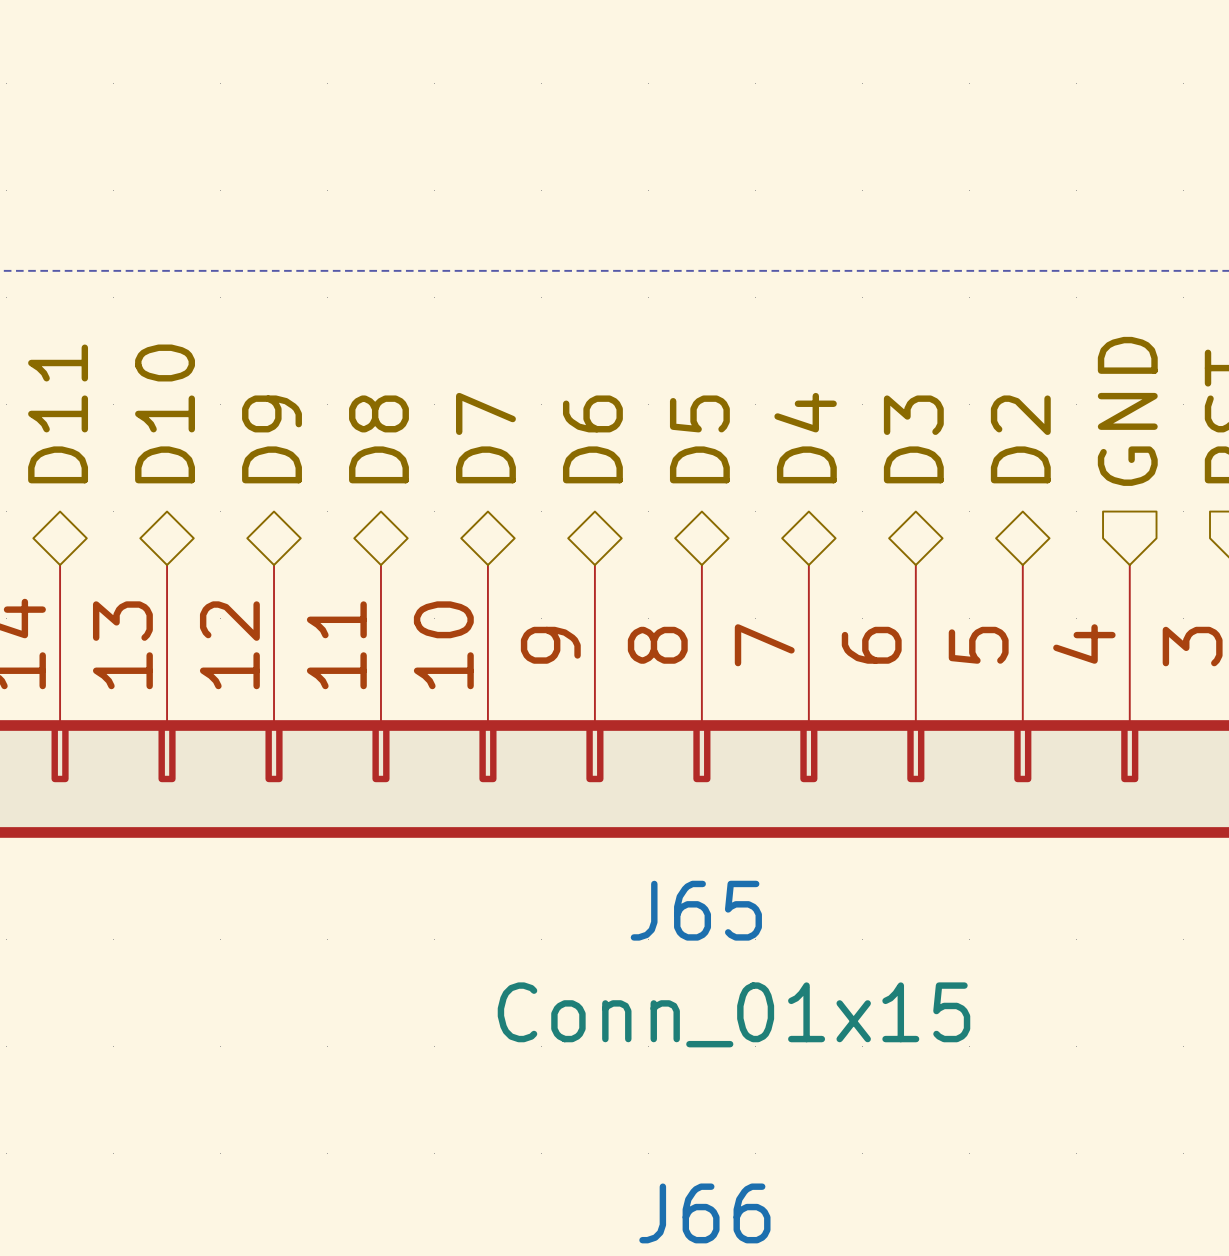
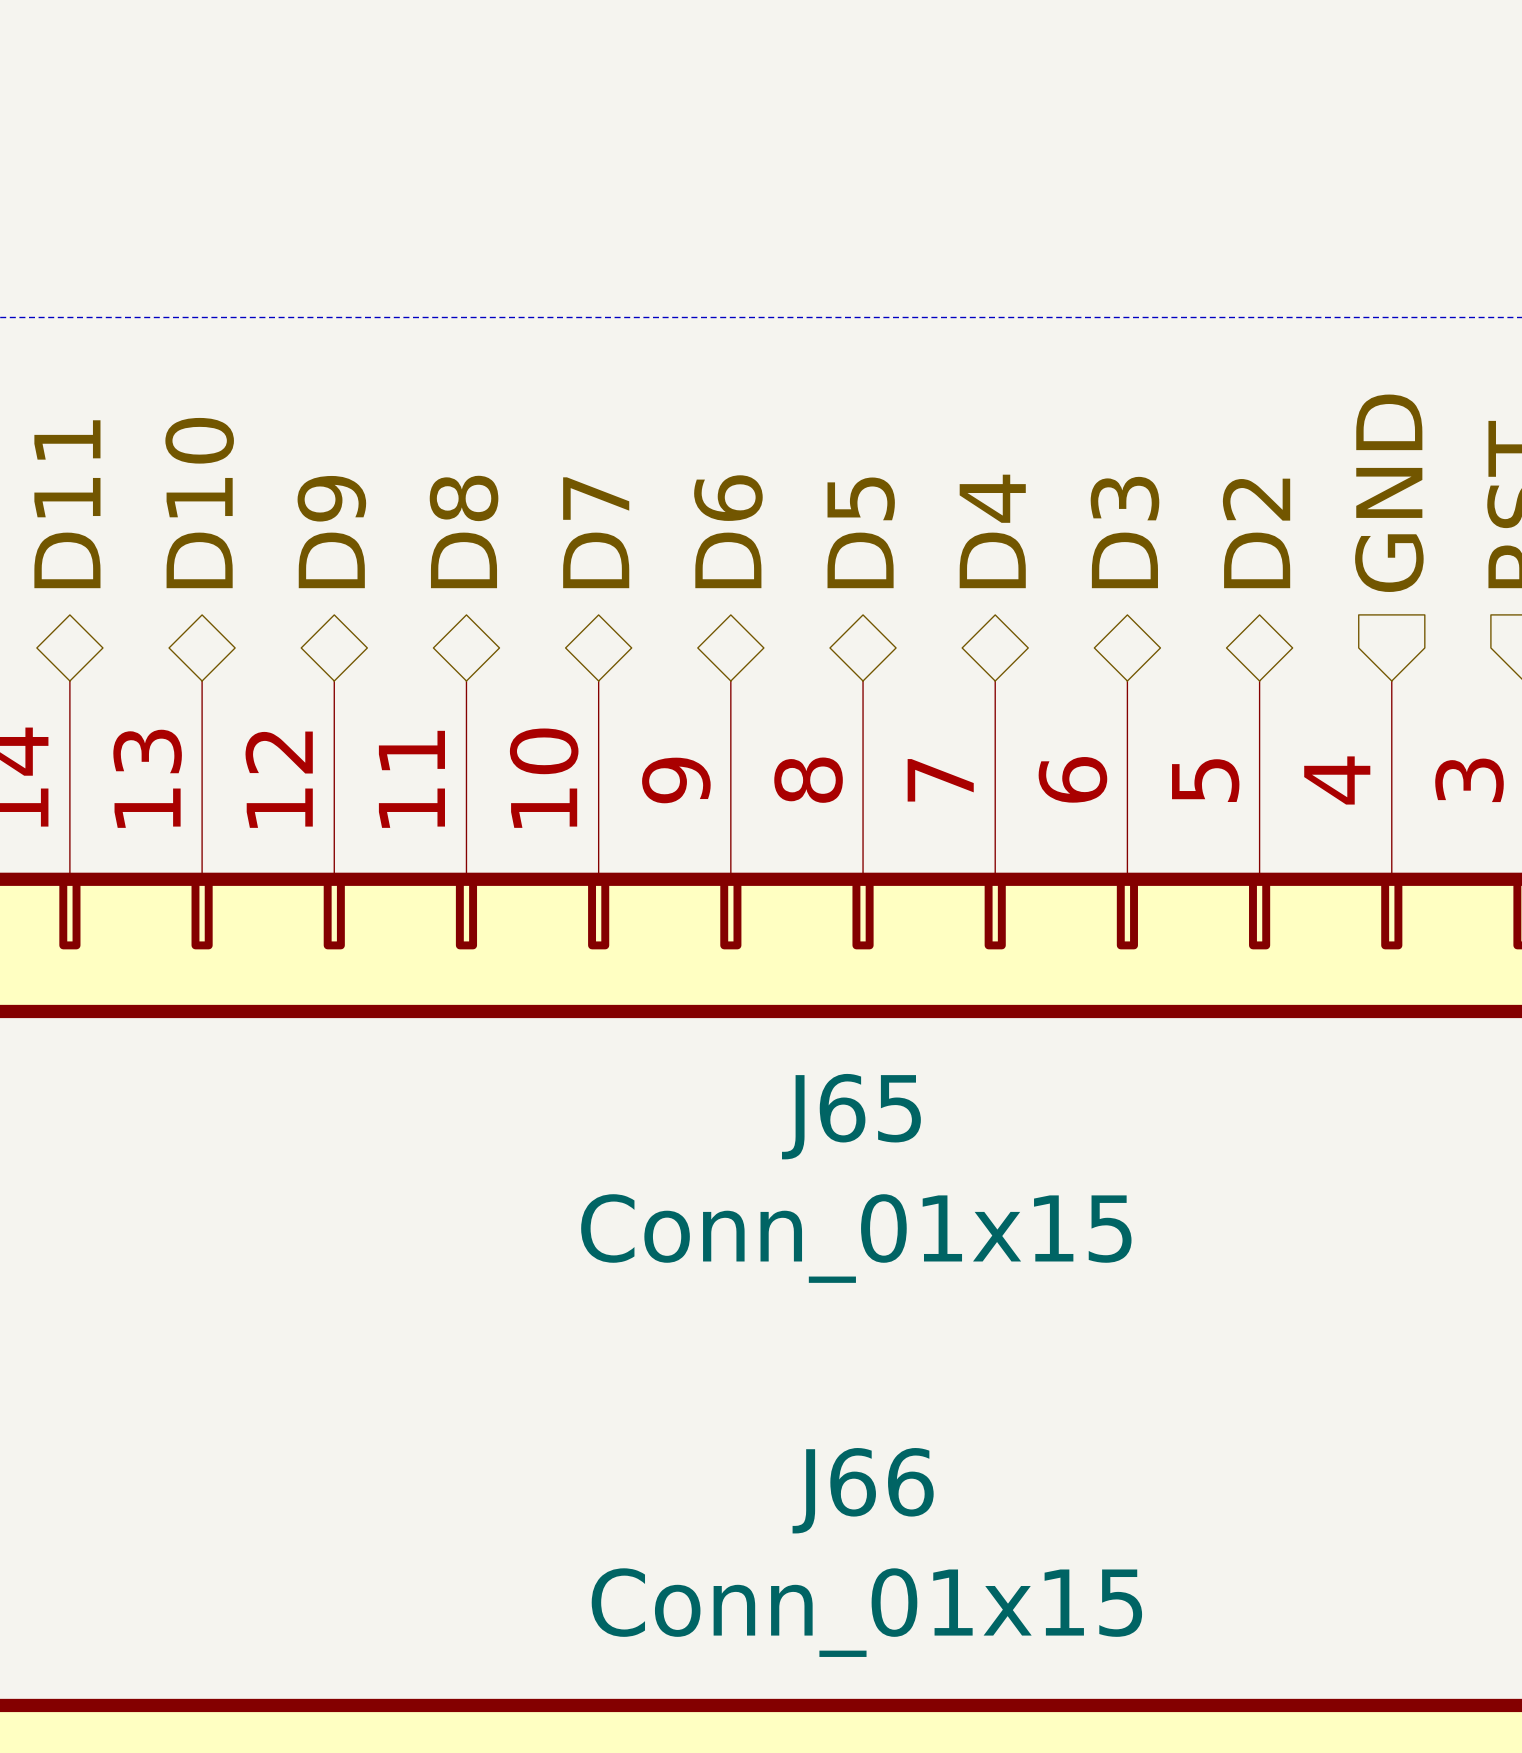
J65 value position: Conn_01x15 (733, 1014) -> Conn_01x15 (856, 1238)

